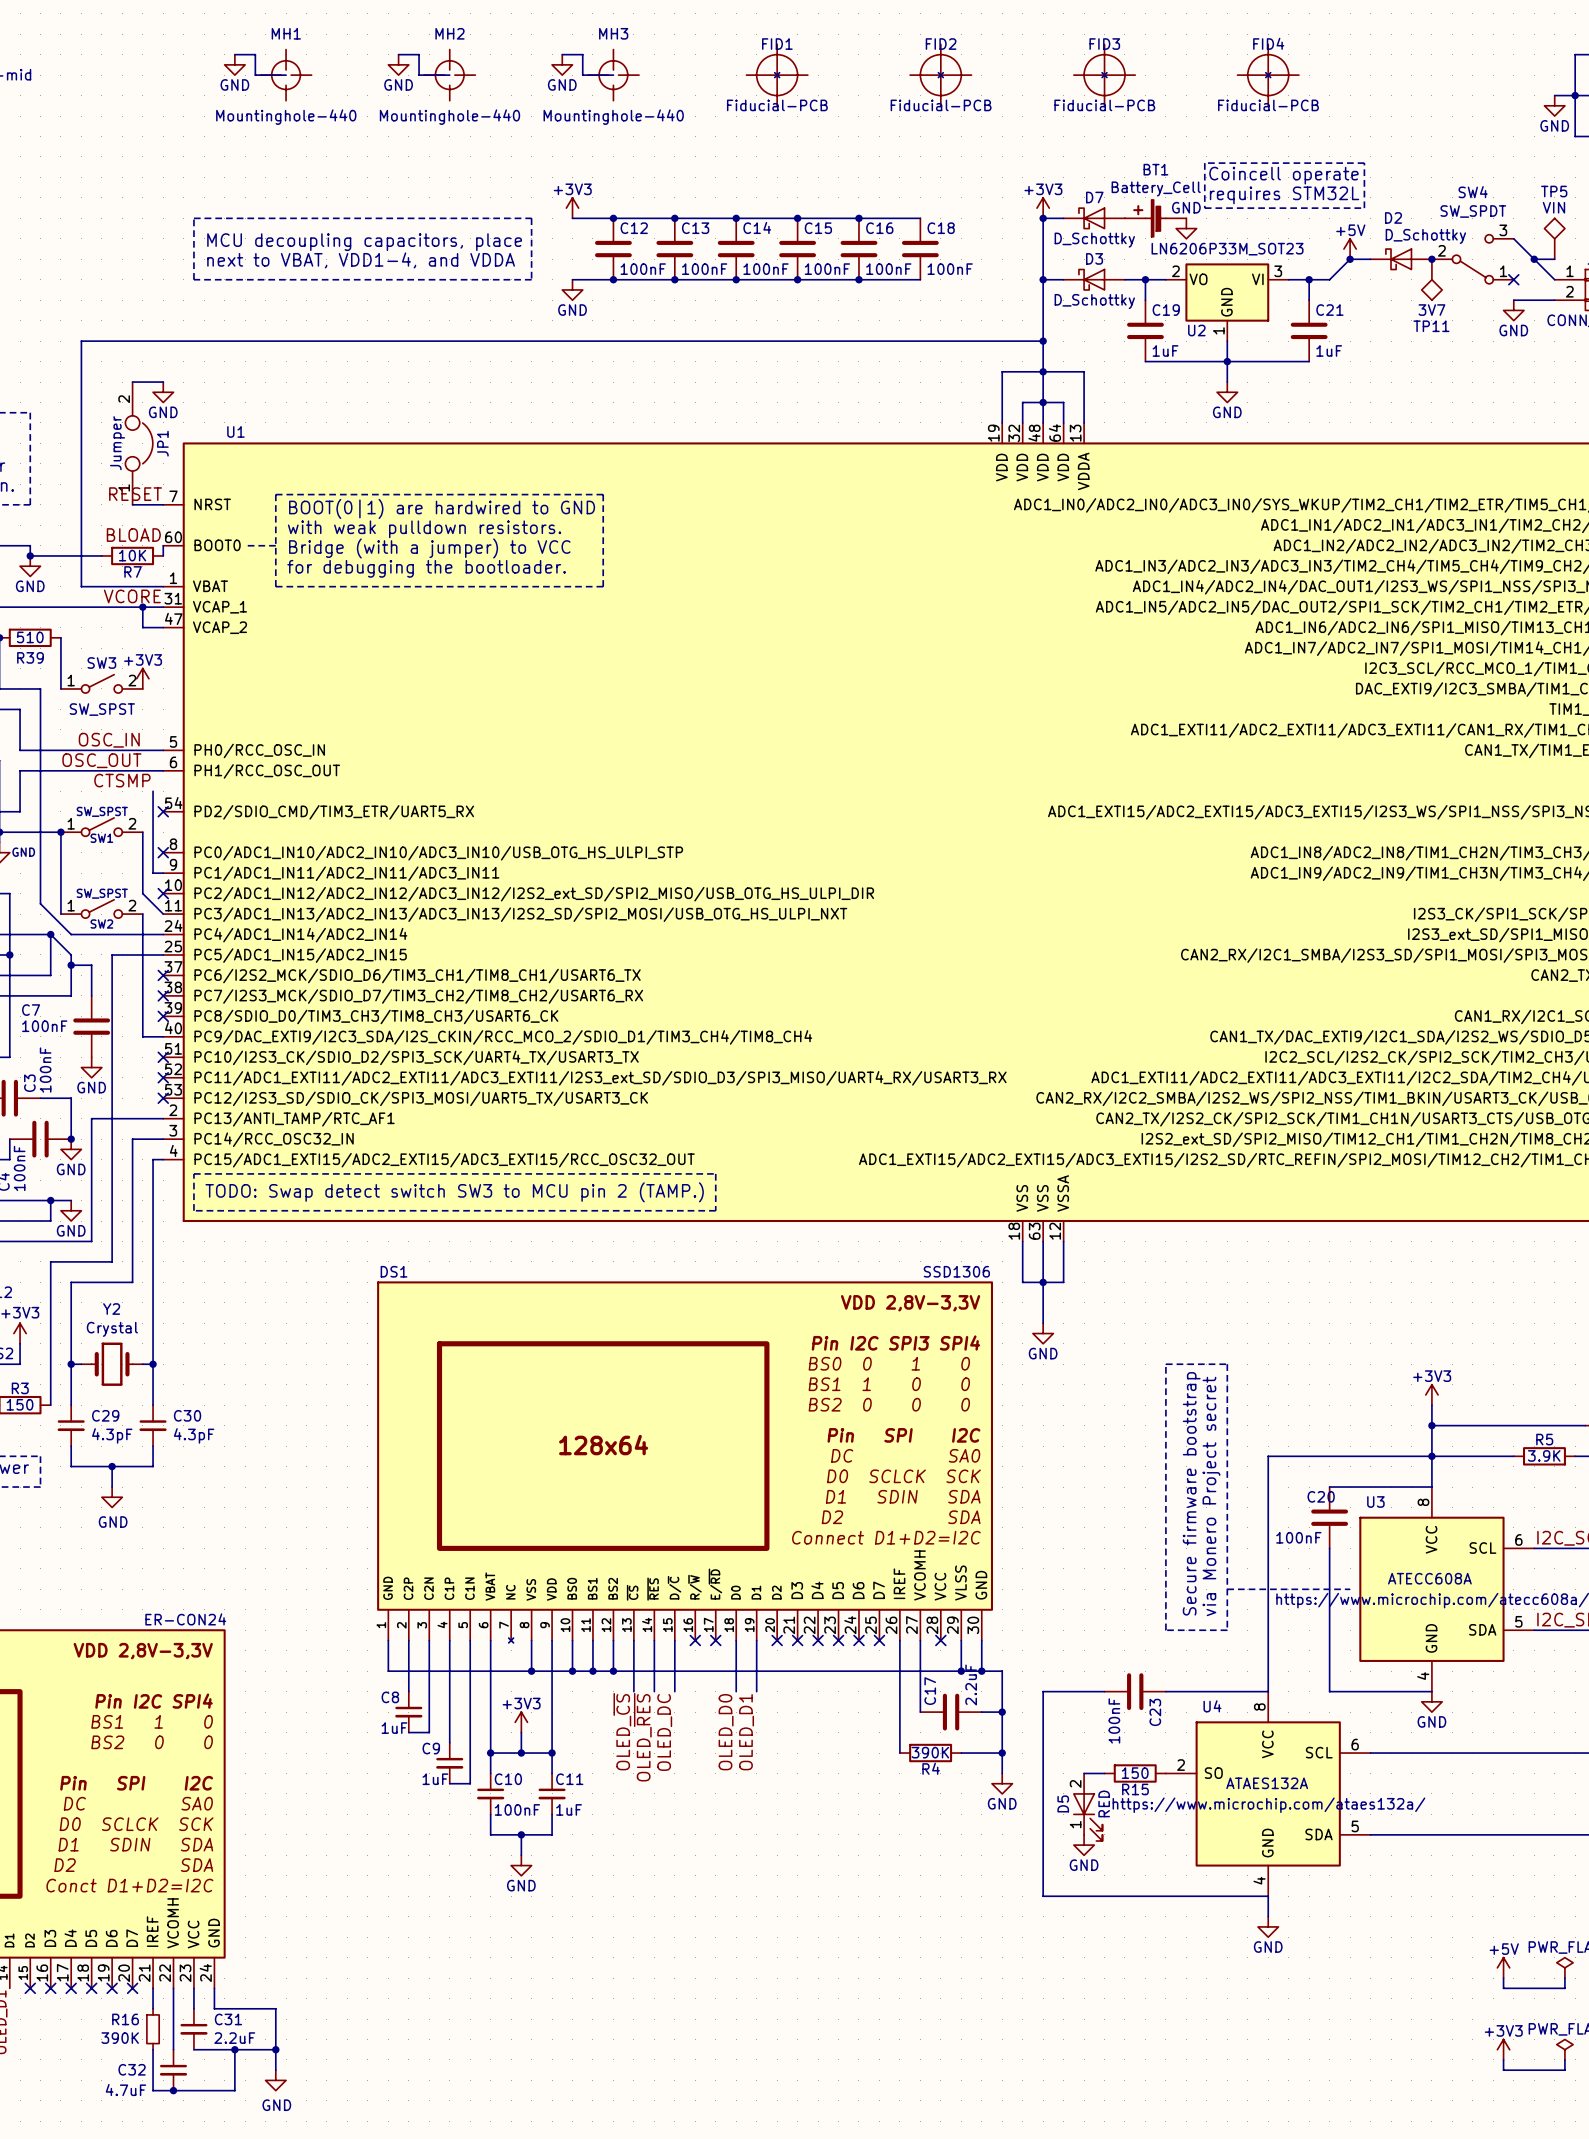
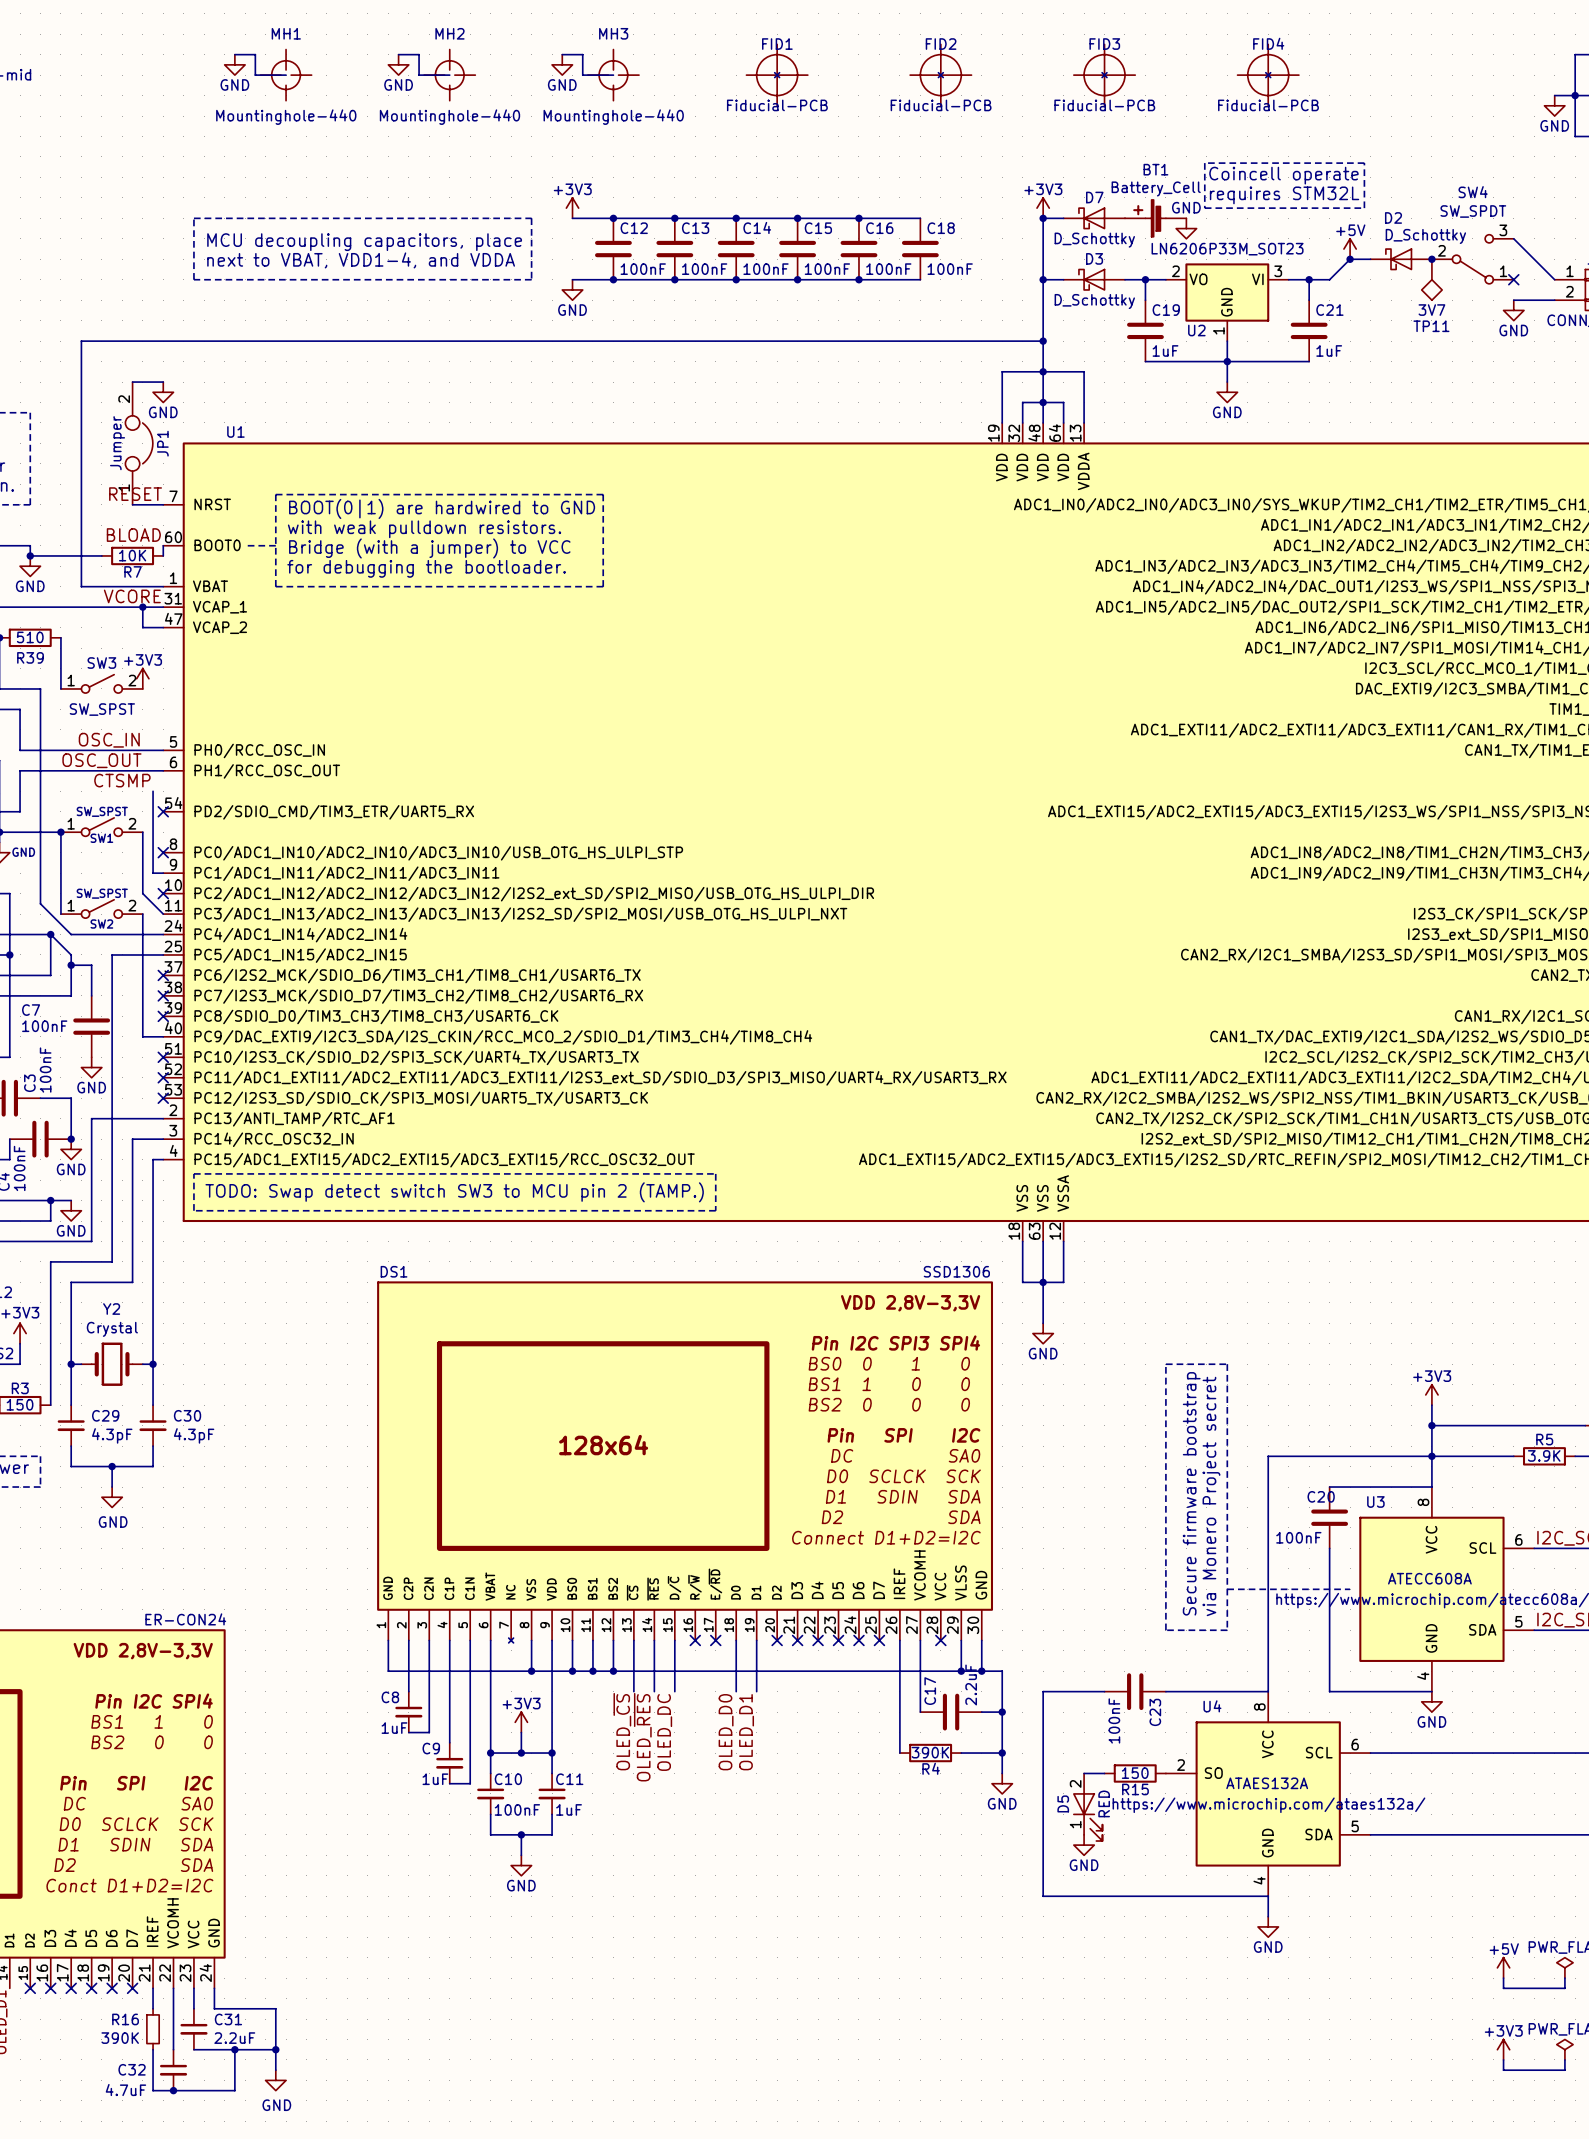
TP5: VIN (1554, 238) -> none
wire: (1534, 259) (1554, 259) -> none
junction: (1534, 259) -> none

